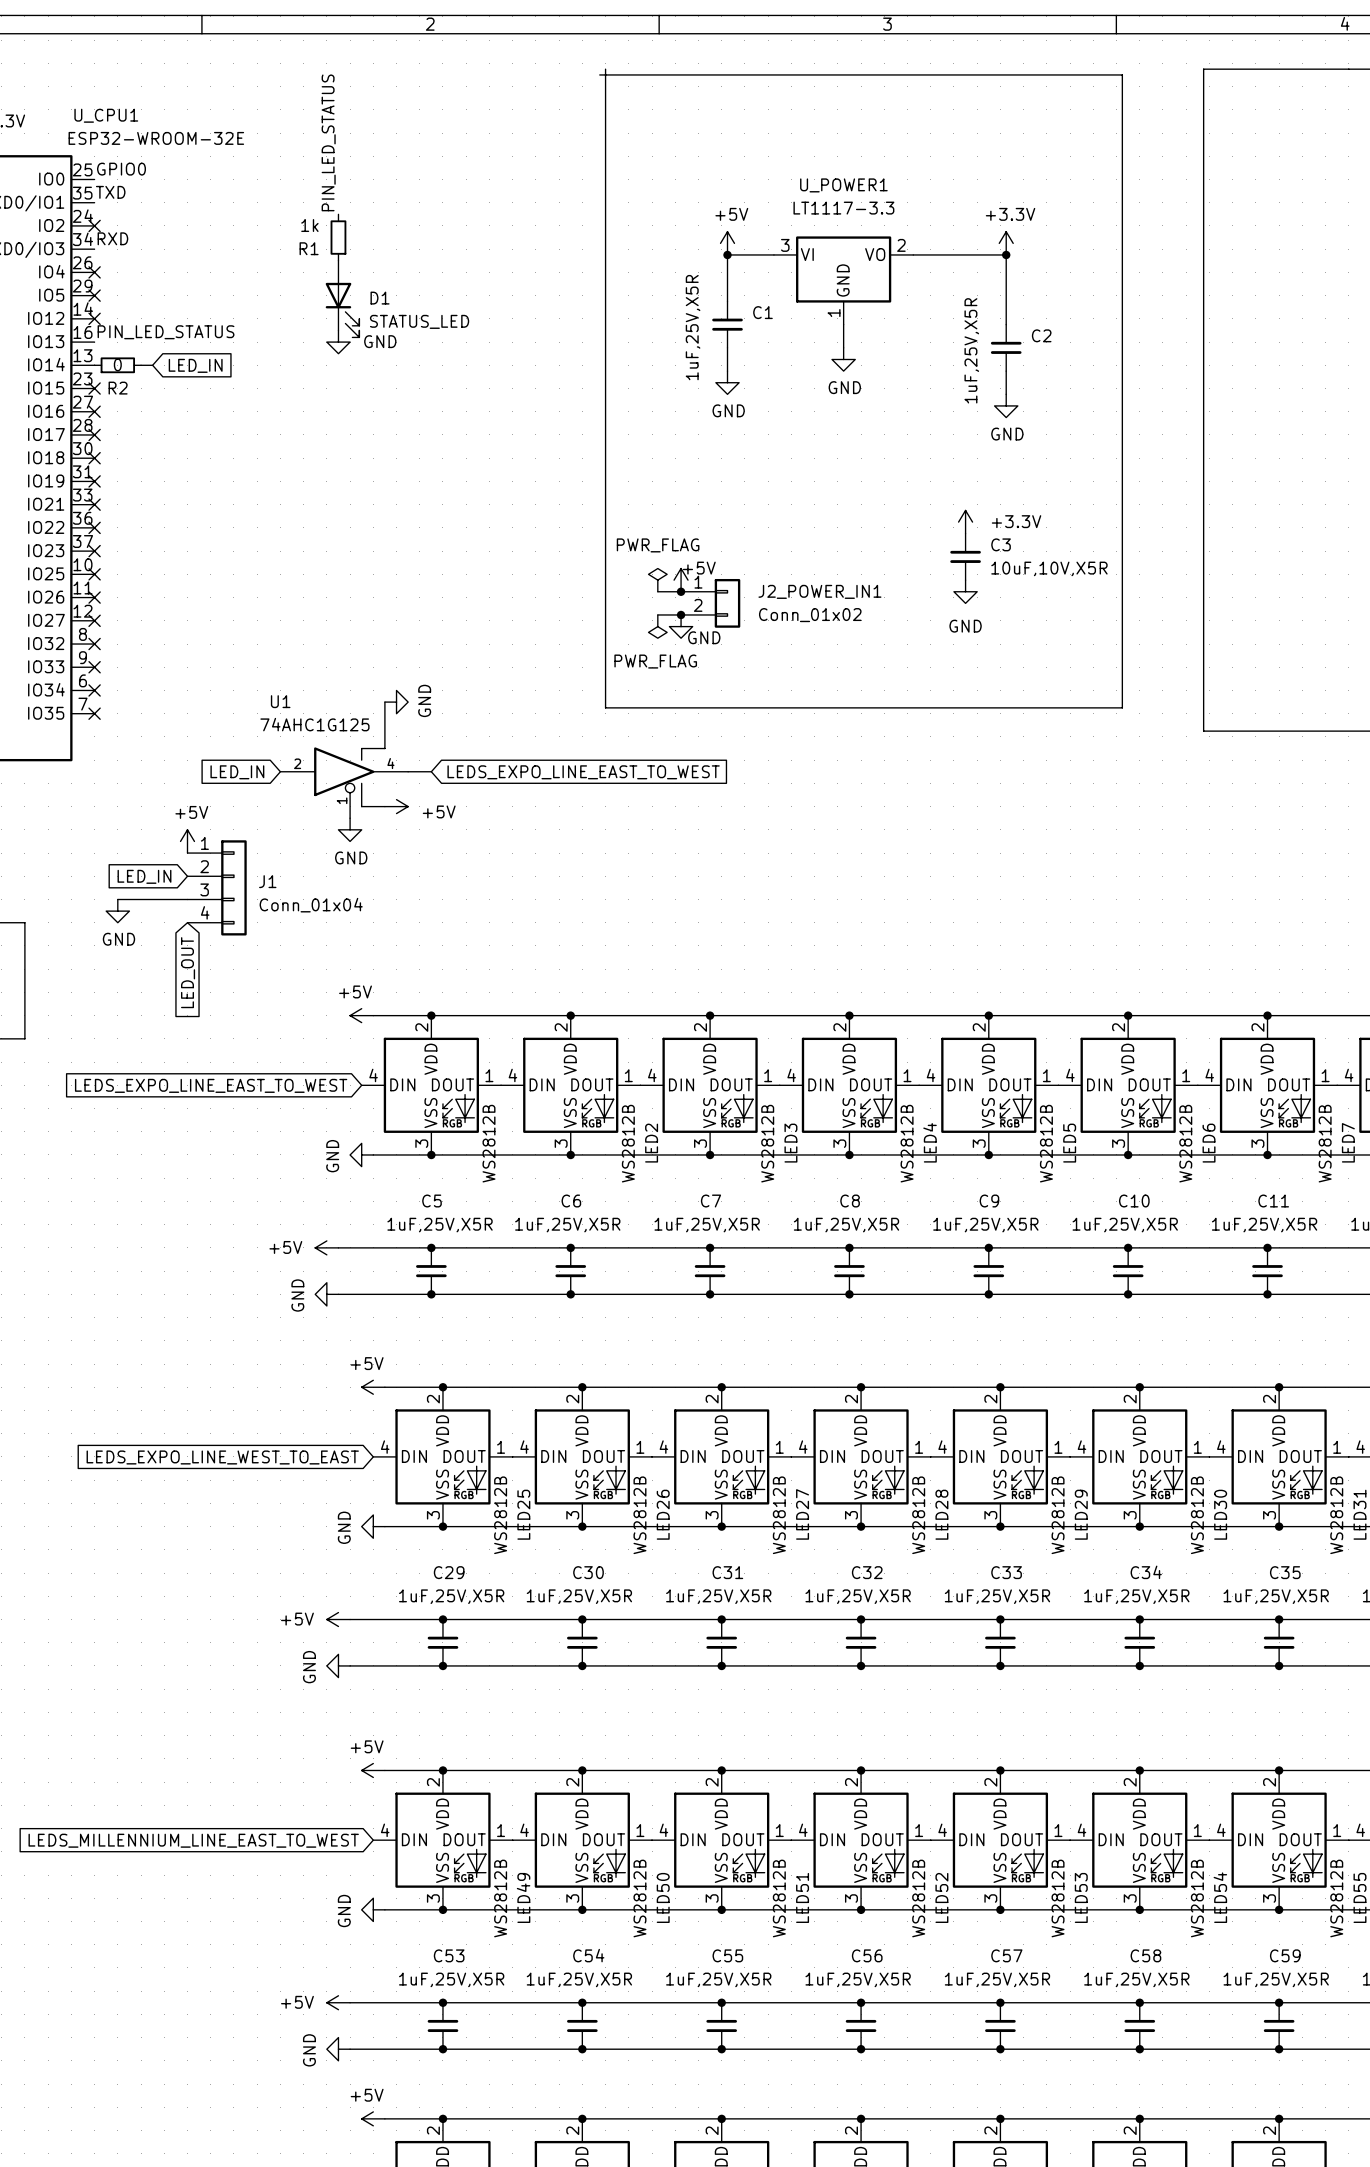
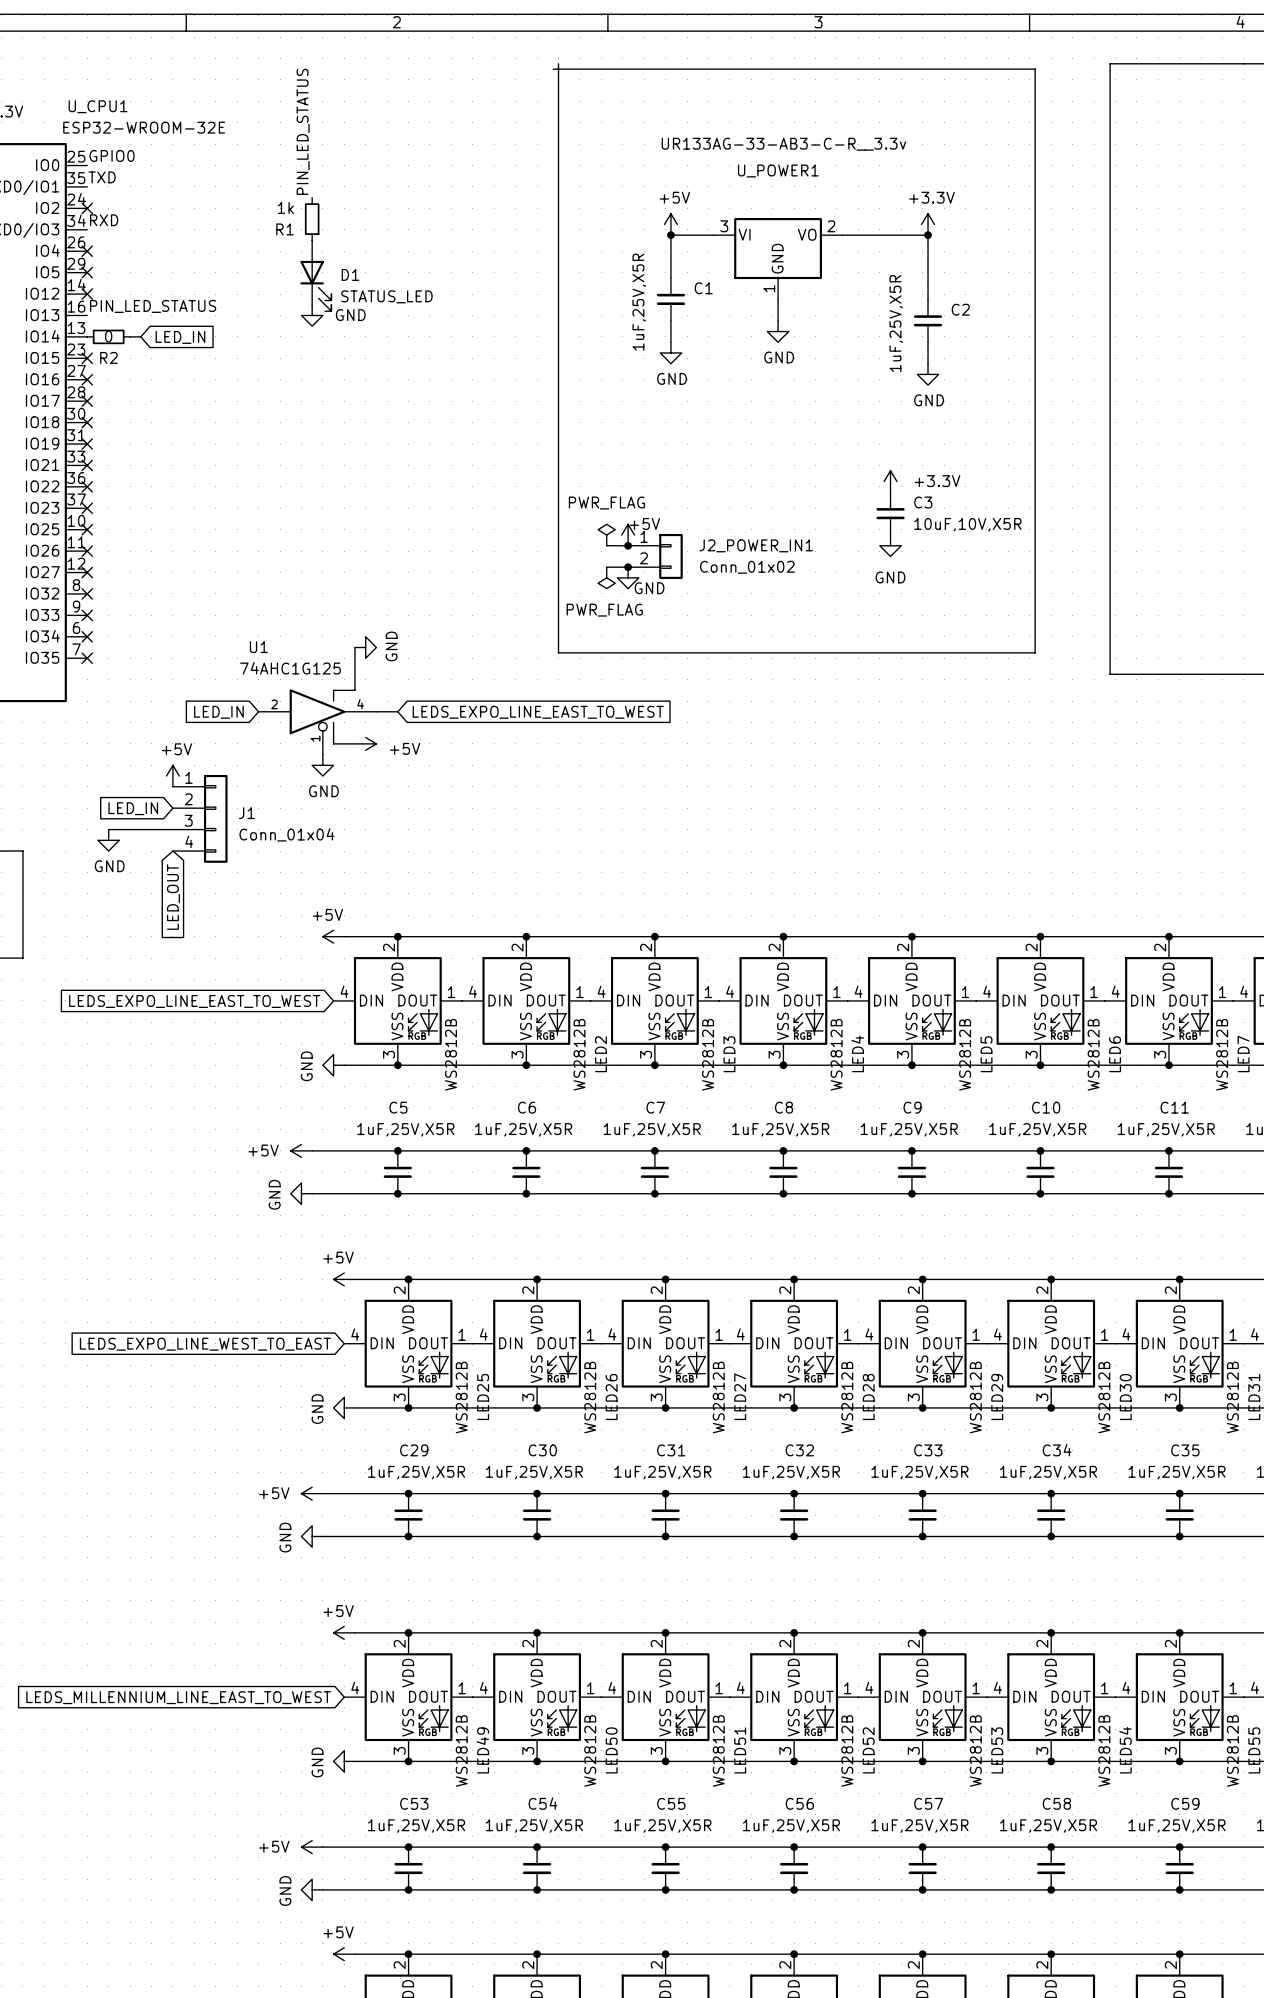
U_POWER1 value: LT1117-3.3 (843, 208) -> UR133AG-33-AB3-C-R__3.3v (783, 144)

